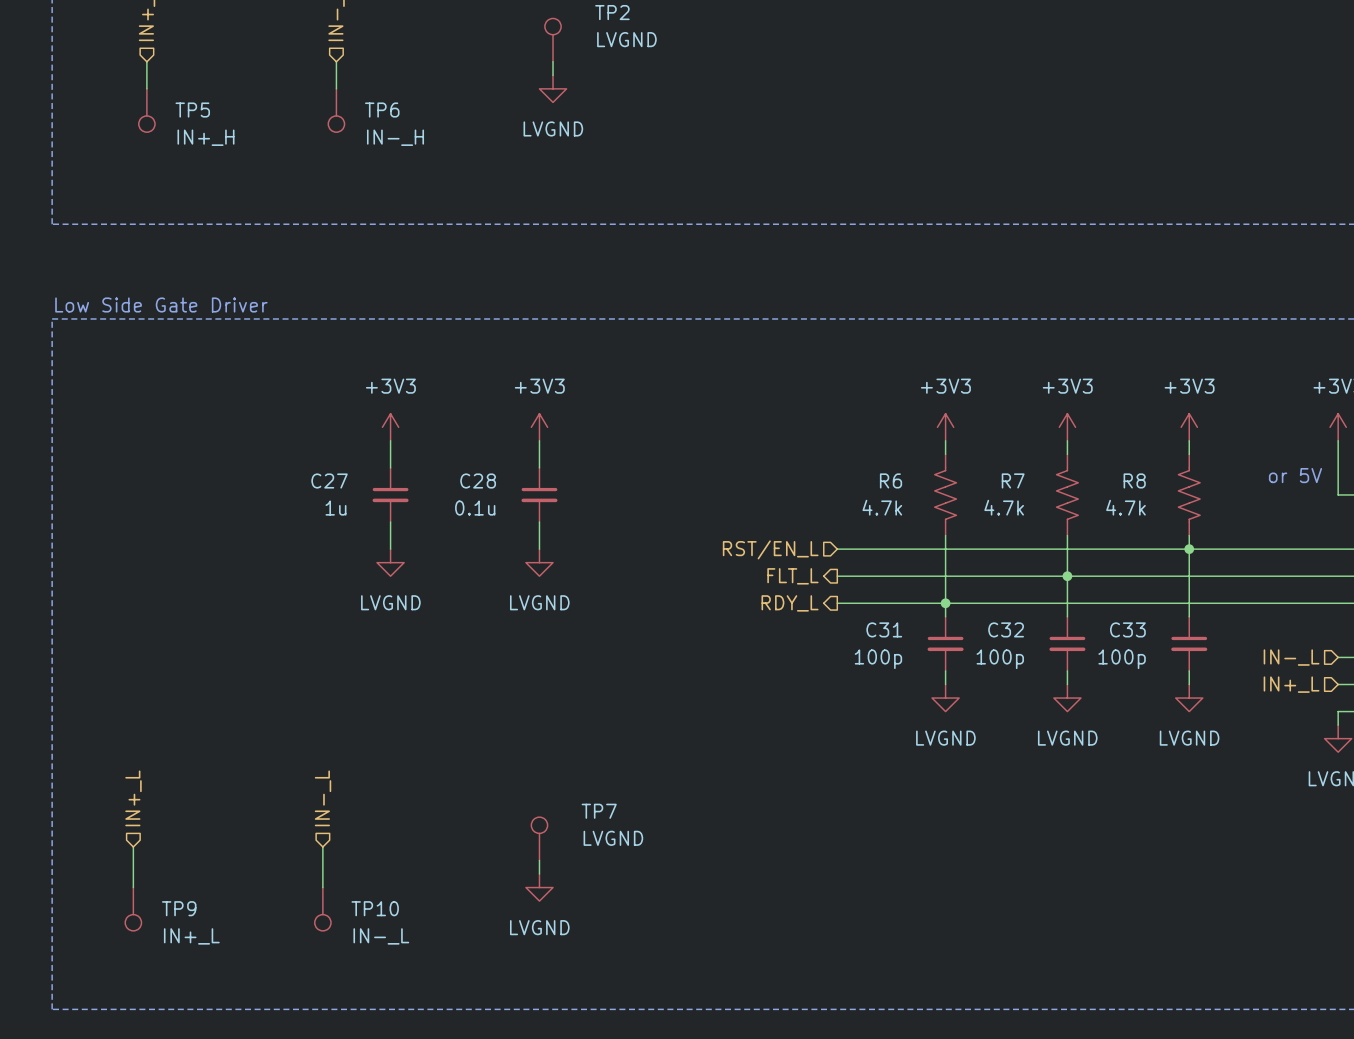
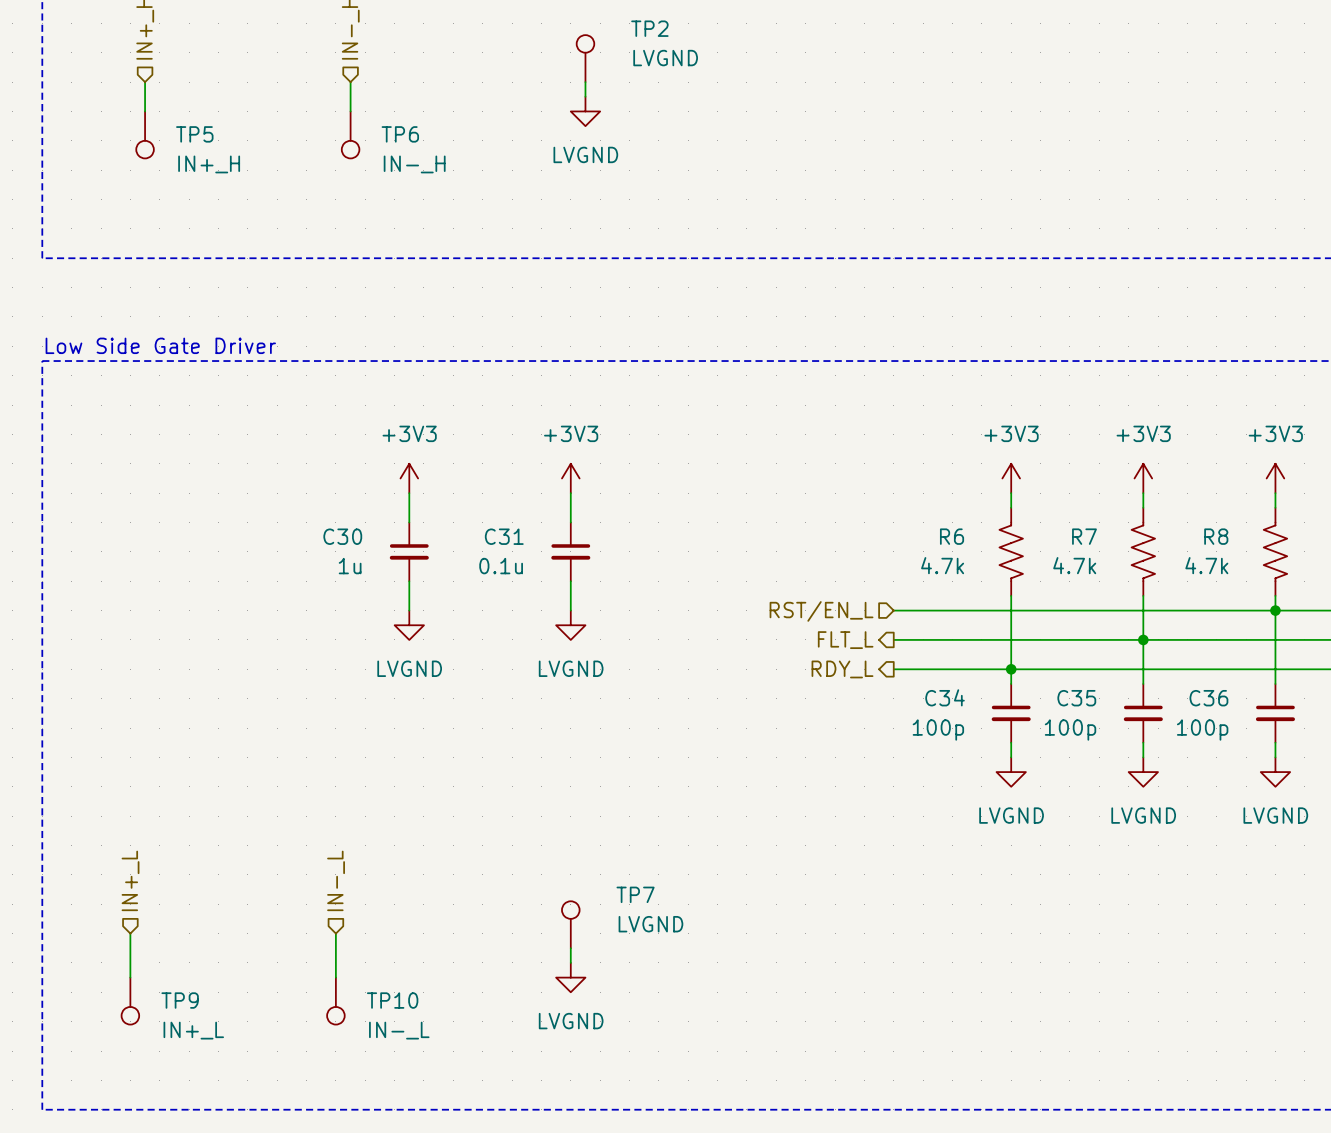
C27 name: C27 (329, 481) -> C30 (342, 536)
C28 name: C28 (478, 481) -> C31 (504, 536)
C31 name: C31 (884, 629) -> C34 (945, 697)
C32 name: C32 (1006, 629) -> C35 (1076, 698)
C33 name: C33 (1127, 629) -> C36 (1208, 698)

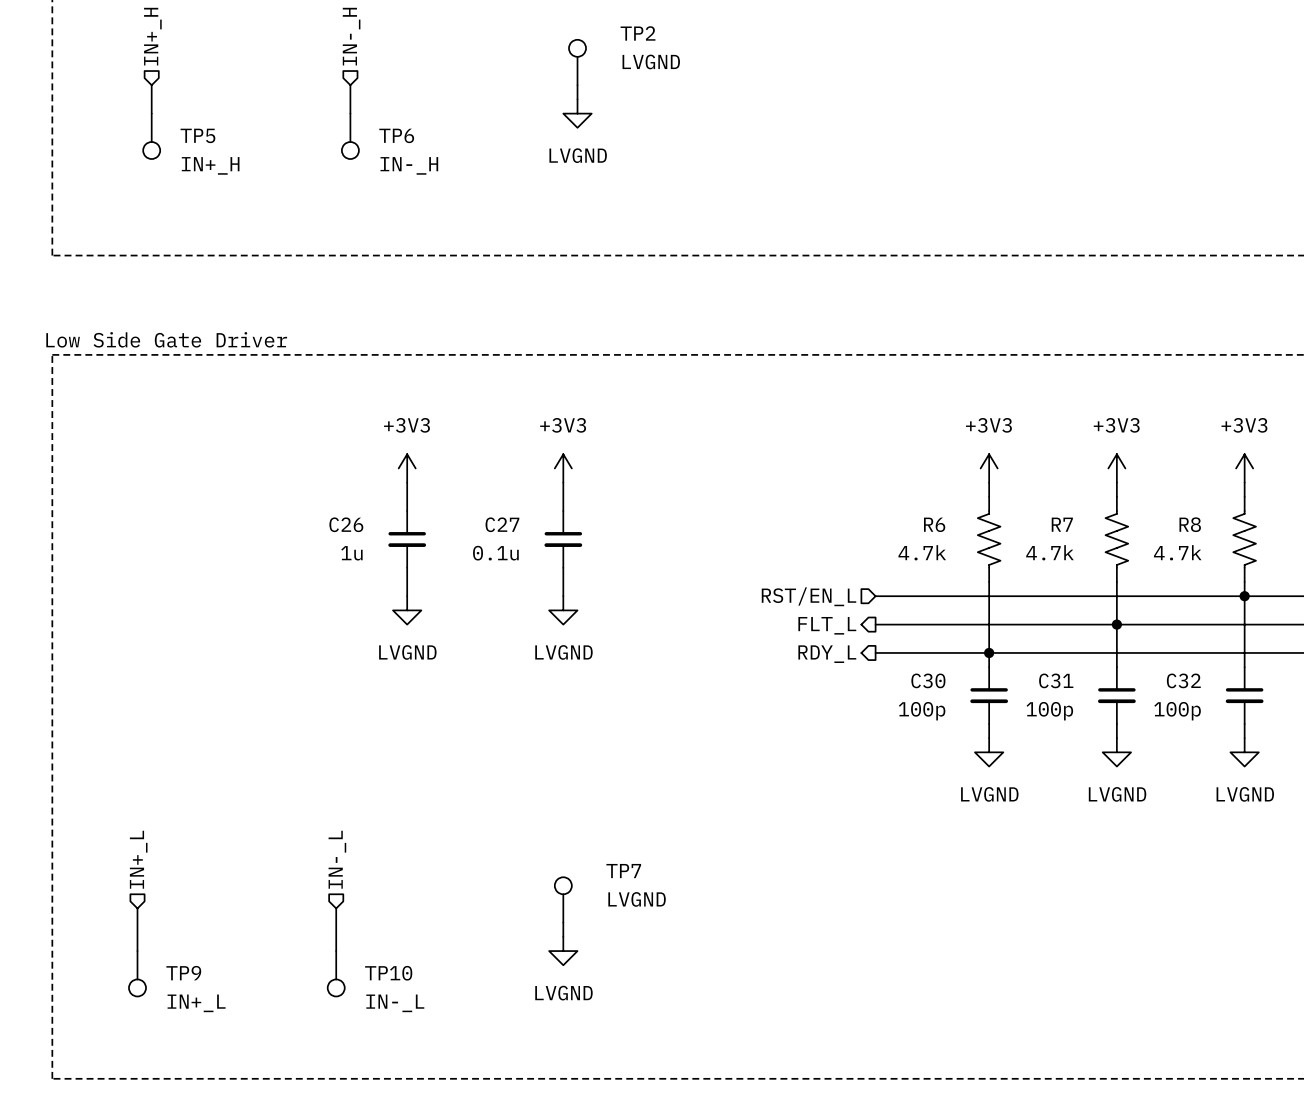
C30 name: C30 (342, 536) -> C26 (346, 524)
C31 name: C31 (504, 536) -> C27 (502, 524)
C34 name: C34 (945, 697) -> C30 (928, 680)
C35 name: C35 (1076, 698) -> C31 (1056, 680)
C36 name: C36 (1208, 698) -> C32 (1183, 680)

